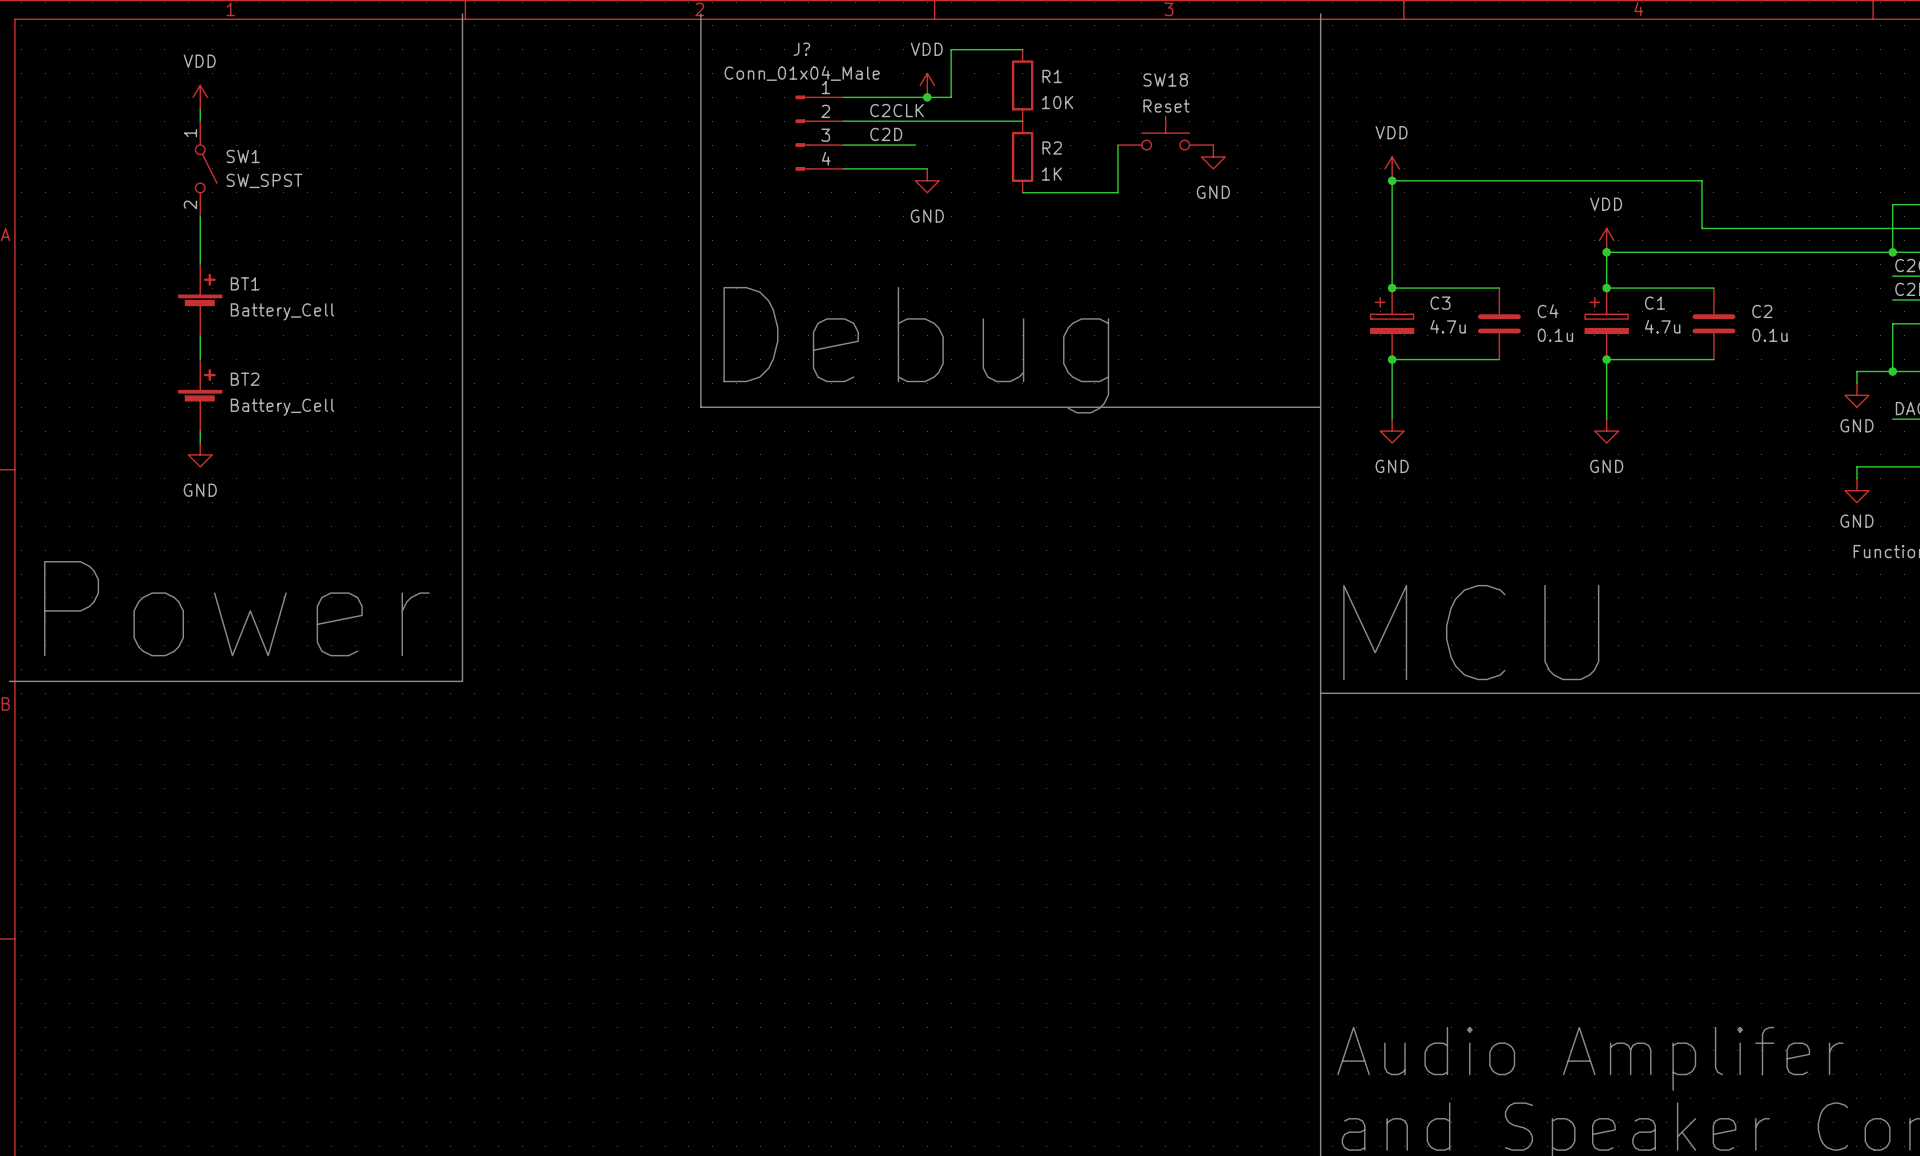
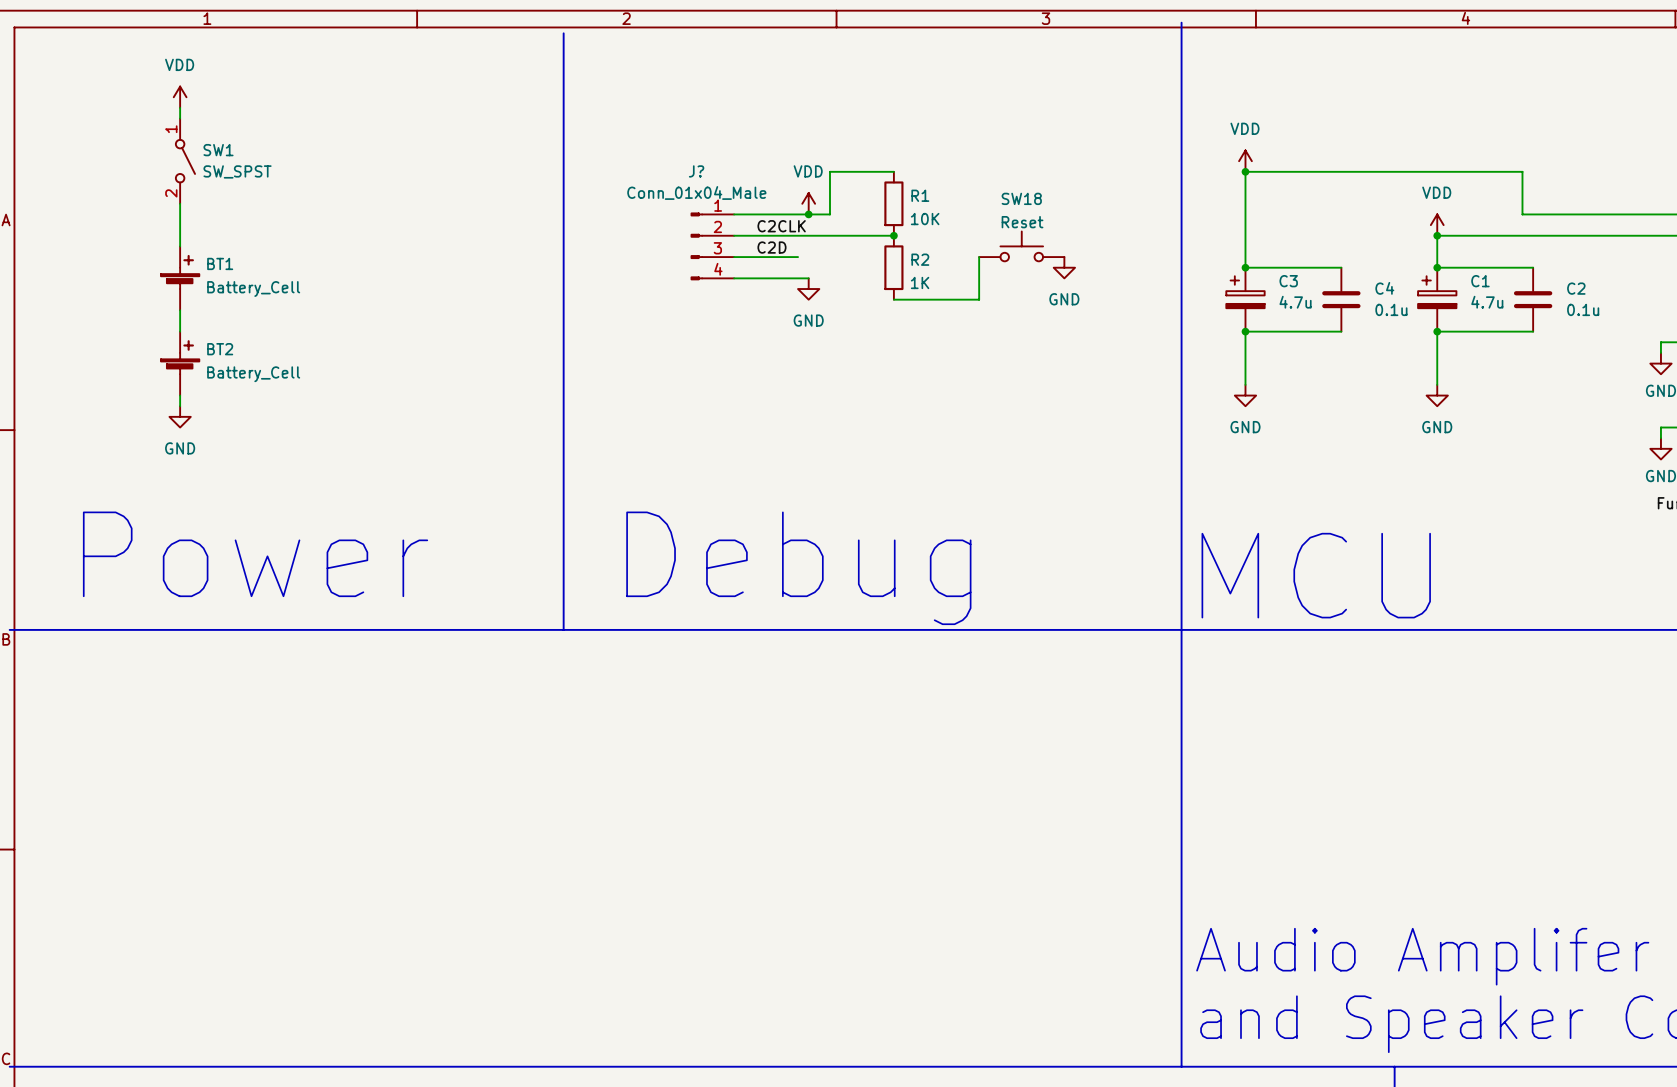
line: (462, 13) (462, 681) (9, 681) -> none
line: (700, 13) (700, 407) (1320, 407) -> none
line: none -> (563, 33) (563, 629)
wire: (1022, 49) (951, 49) (951, 97) (843, 97) -> (893, 171) (829, 171) (829, 214) (734, 214)
power symbol position: VDD (927, 85) -> VDD (808, 203)
R1 position: (1022, 85) -> (893, 203)
junction: (927, 97) -> none
label position: C2CLK (897, 110) -> C2CLK (781, 226)
wire: (843, 121) (1022, 121) -> (734, 235) (893, 235)
J? position: (819, 133) -> (712, 246)
SW18 position: (1165, 133) -> (1021, 246)
label position: C2D (886, 134) -> C2D (771, 247)
wire: (843, 145) (915, 145) -> (734, 257) (798, 257)
wire: (1118, 145) (1118, 192) (1022, 192) -> (979, 257) (979, 299) (893, 299)
R2 position: (1022, 156) -> (893, 267)
power symbol position: GND (1213, 156) -> GND (1064, 267)
wire: (843, 168) (927, 168) -> (734, 278) (808, 278)
power symbol position: GND (927, 180) -> GND (808, 289)
junction: none -> (808, 214)
junction: none -> (893, 235)
text: Debug (916, 350) -> none
text position: Power (236, 608) -> Power (255, 554)
text: none -> Debug (798, 568)
line: none -> (9, 629) (1181, 629)

